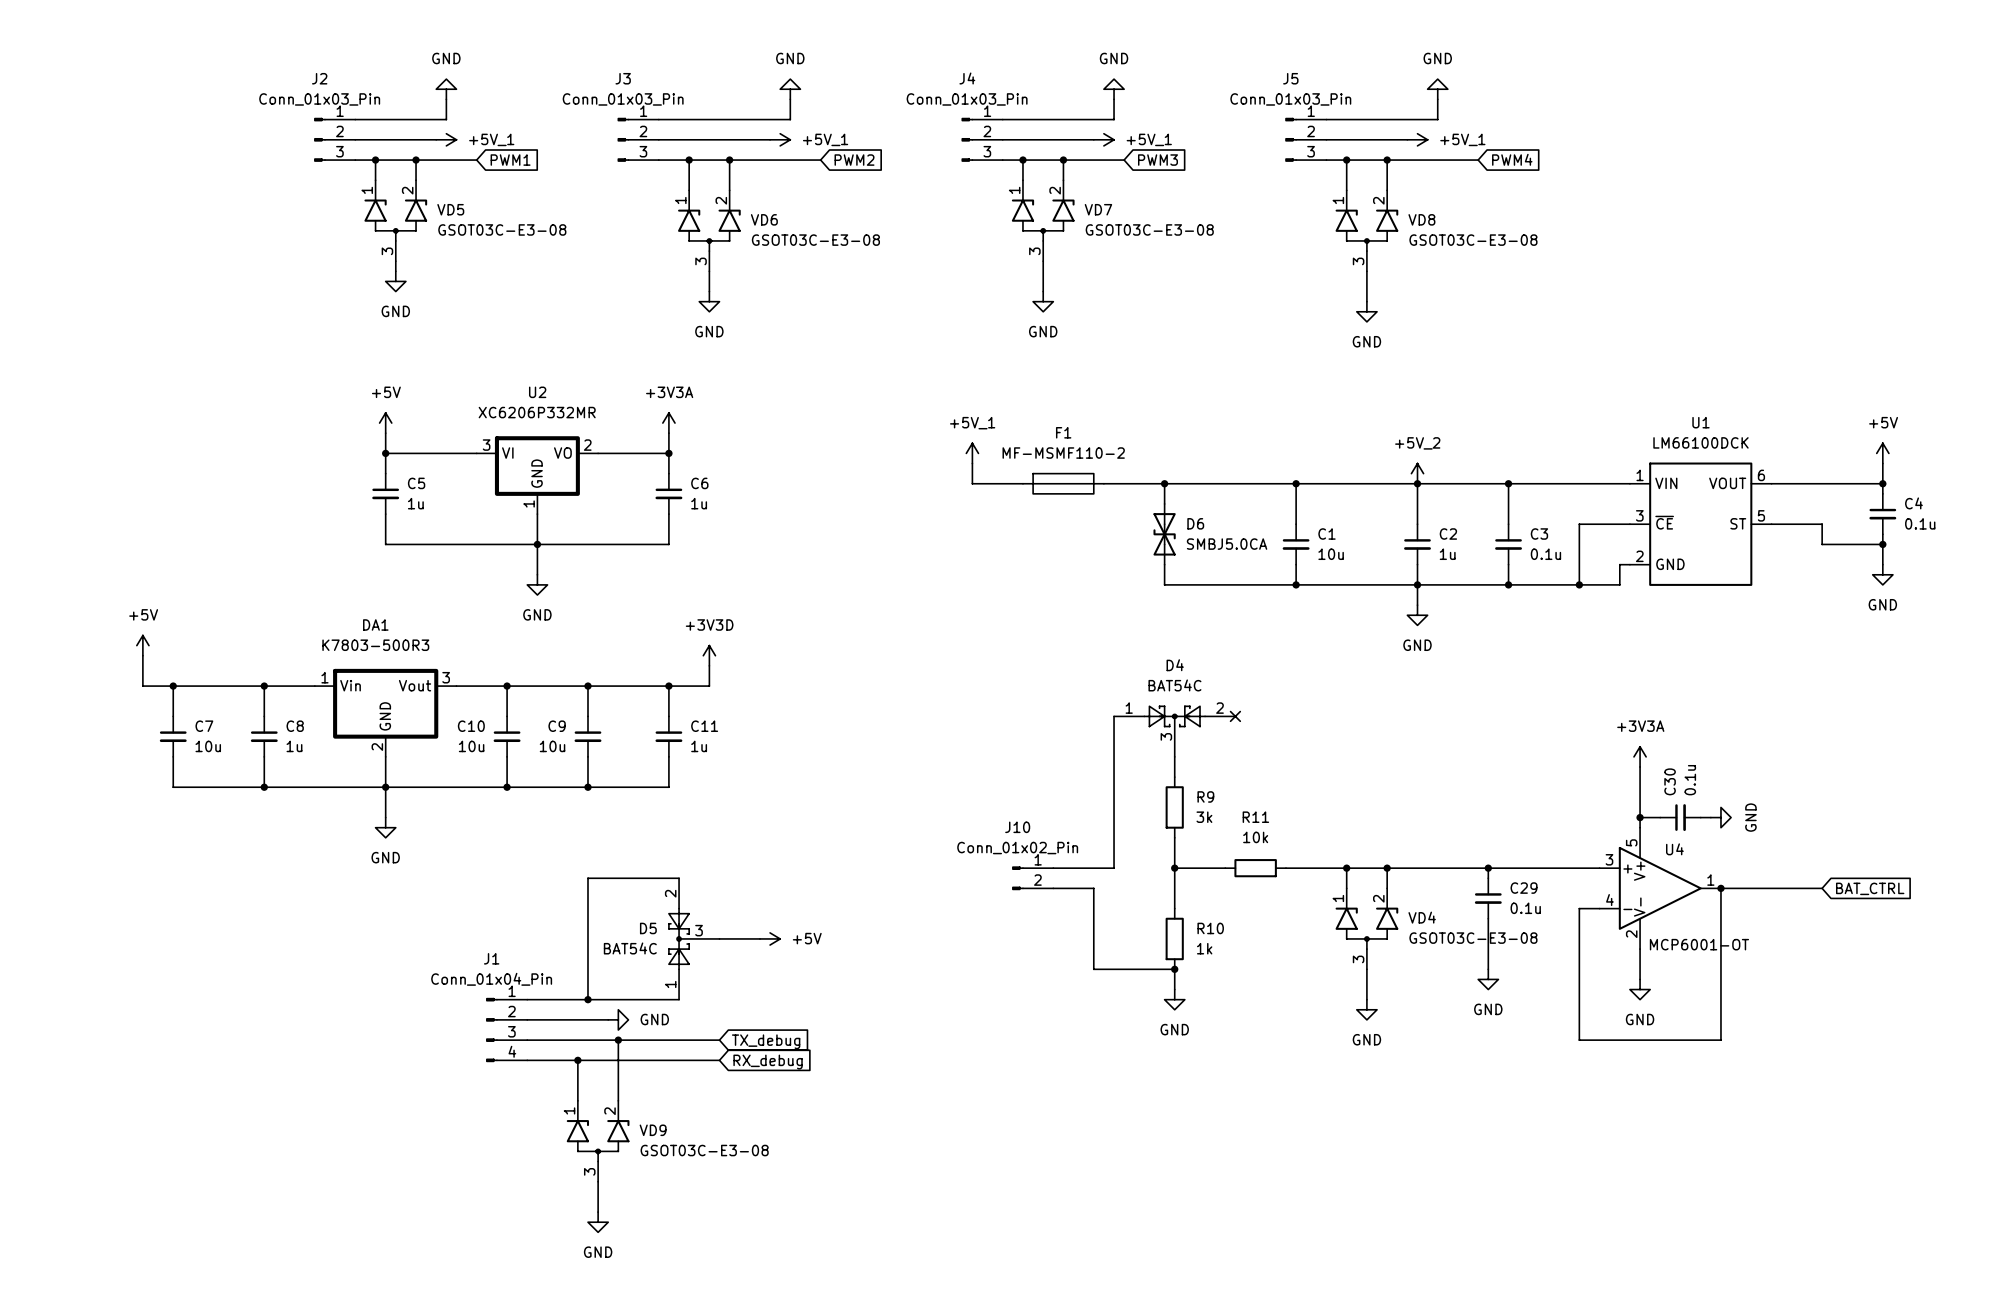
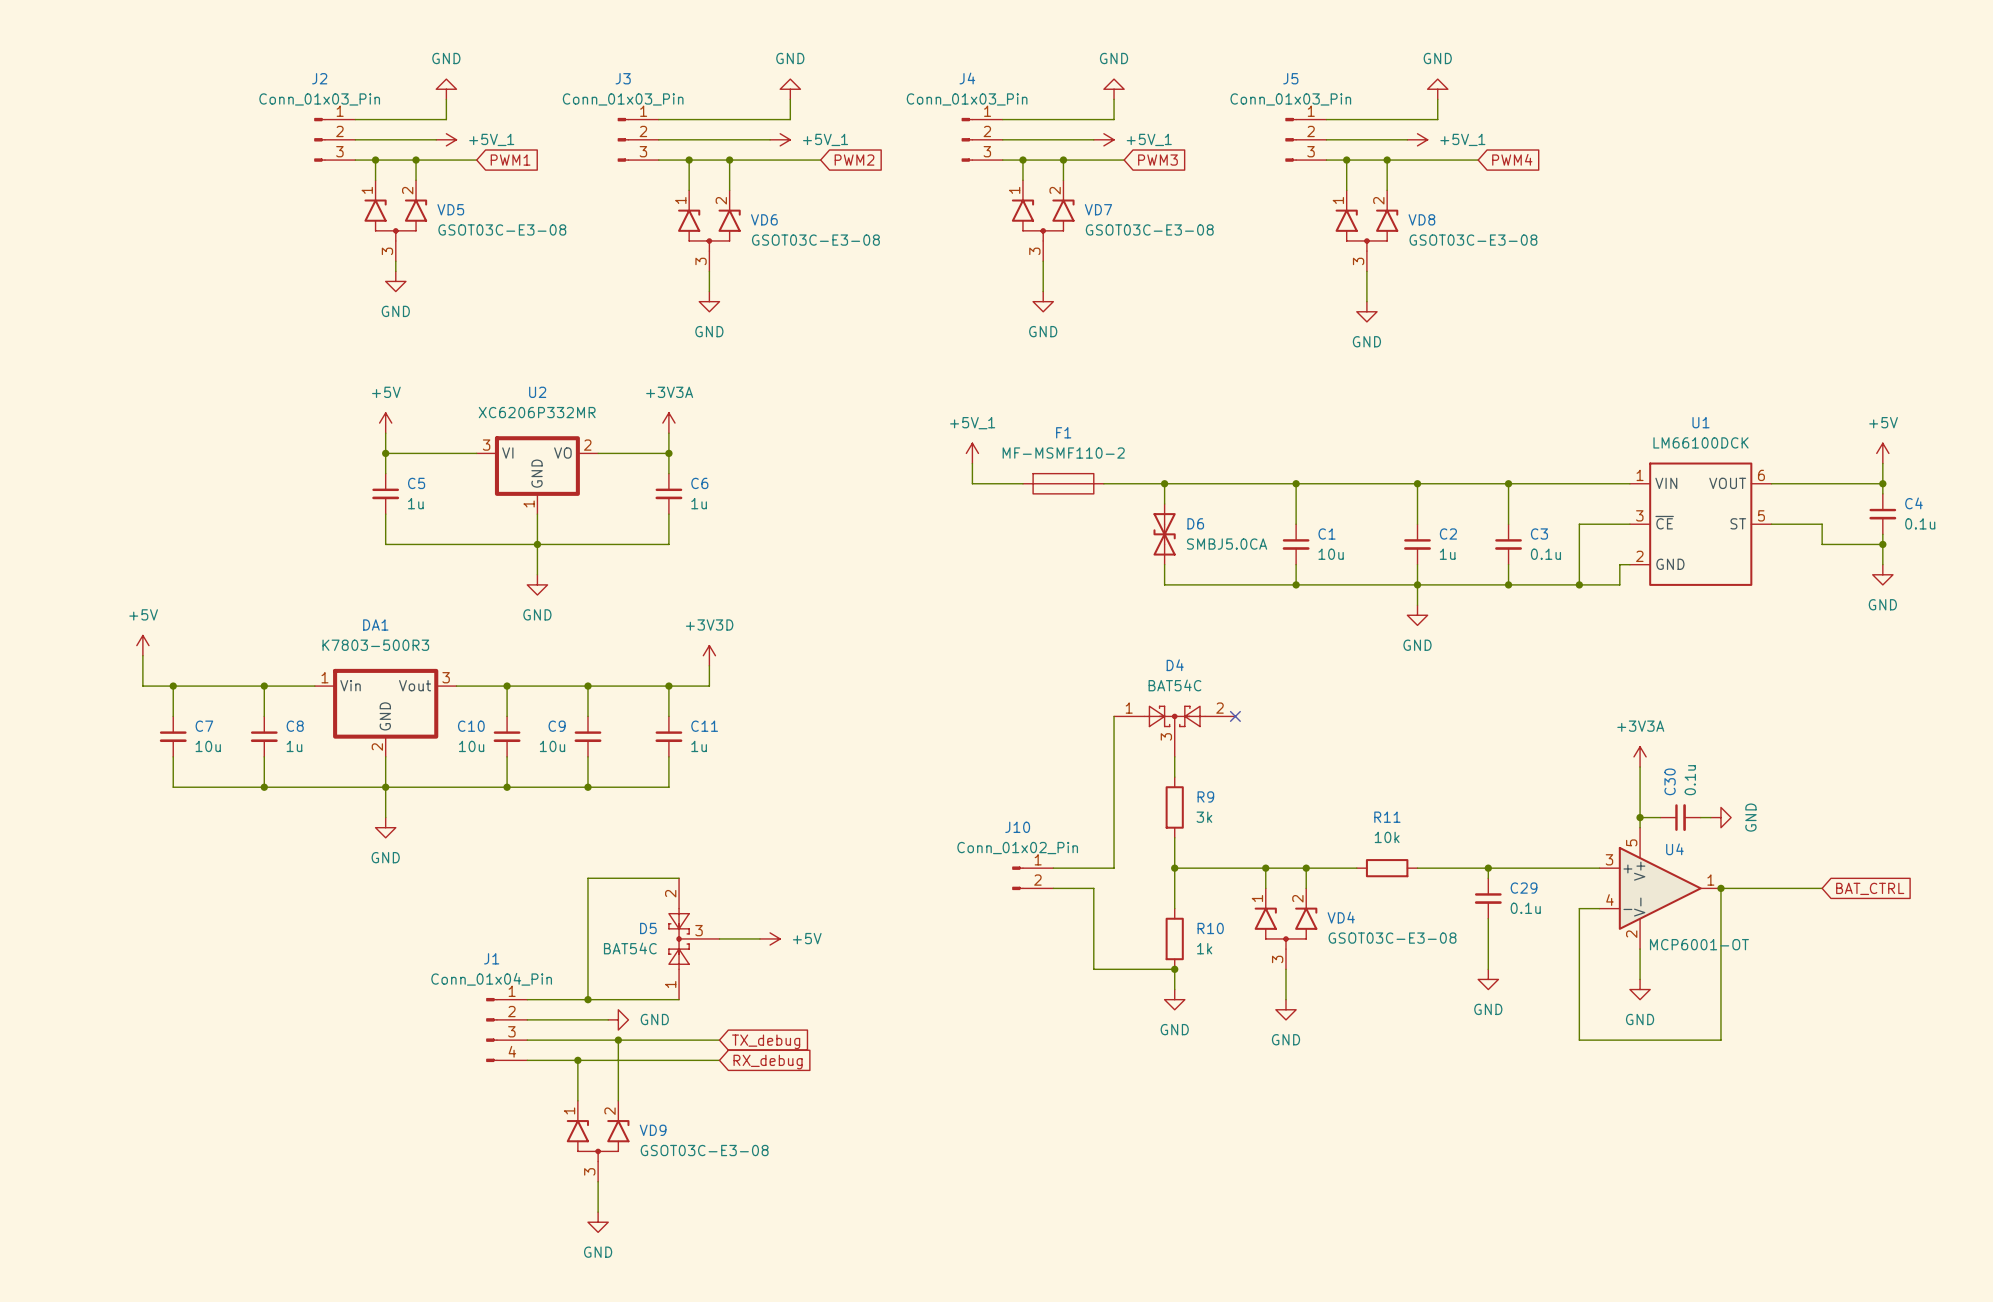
power symbol: +5V_2 (1417, 473) -> none
R11 position: (1255, 868) -> (1387, 868)
junction: none -> (1265, 868)
junction: none -> (1306, 868)
wire: (1346, 868) (1346, 888) -> (1306, 868) (1306, 888)
junction: (1346, 868) -> none
wire: (1356, 868) (1417, 868) -> (1225, 868) (1285, 868)
wire: (1387, 868) (1387, 888) -> (1265, 868) (1265, 888)
junction: (1387, 868) -> none
VD4 position: (1366, 928) -> (1285, 928)
wire: (1366, 969) (1366, 999) -> (1285, 969) (1285, 999)
power symbol position: GND (1366, 1009) -> GND (1285, 1009)

